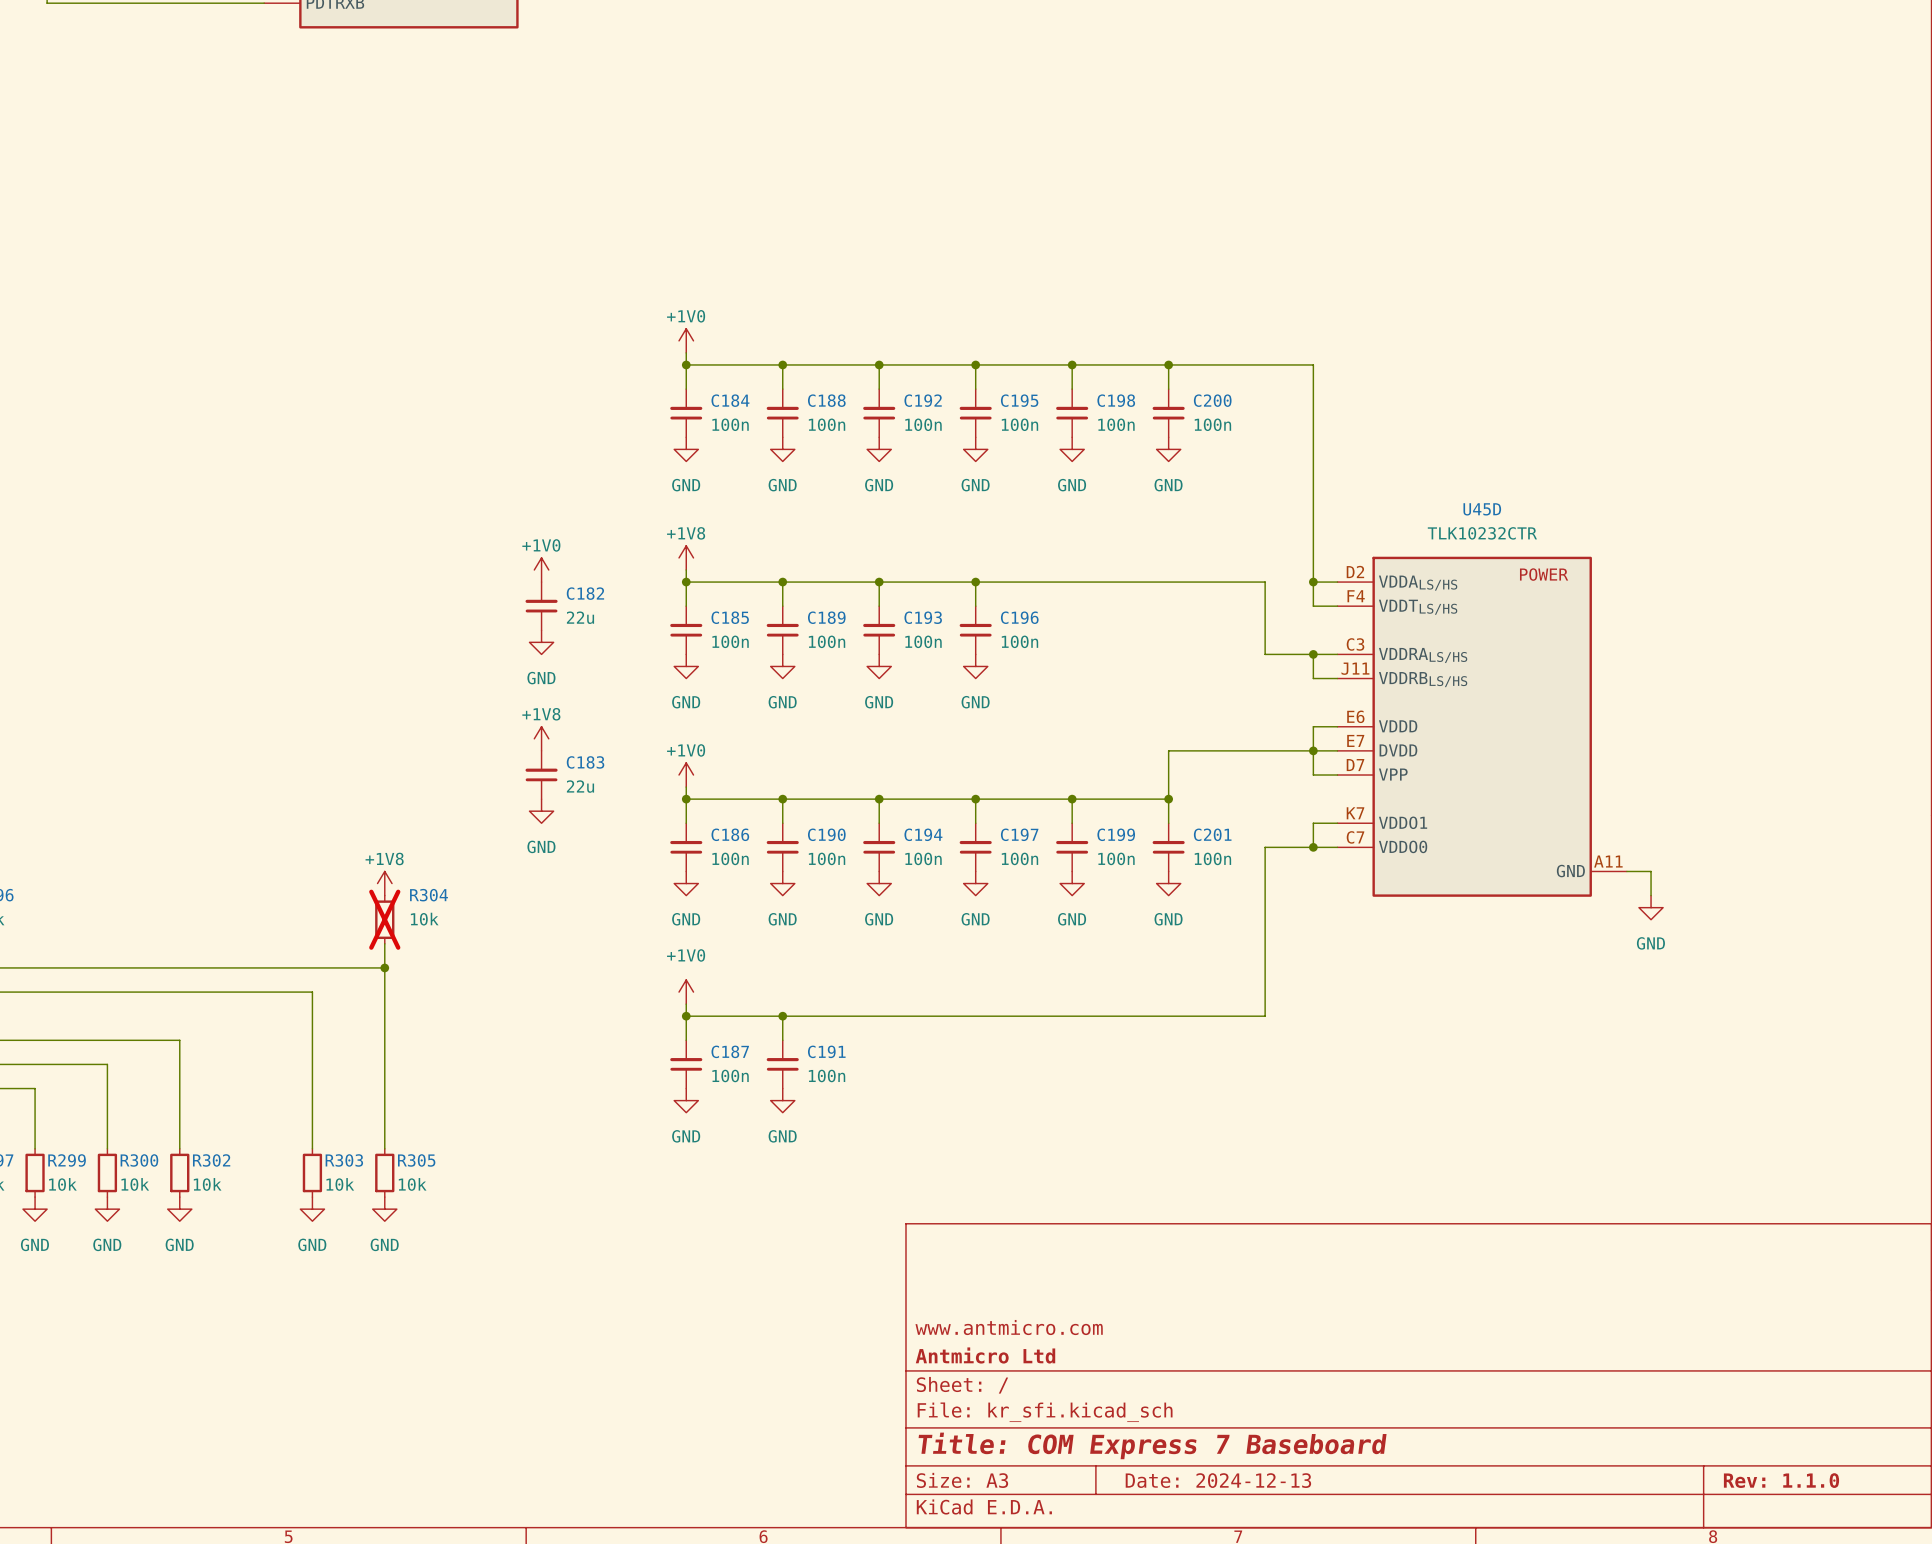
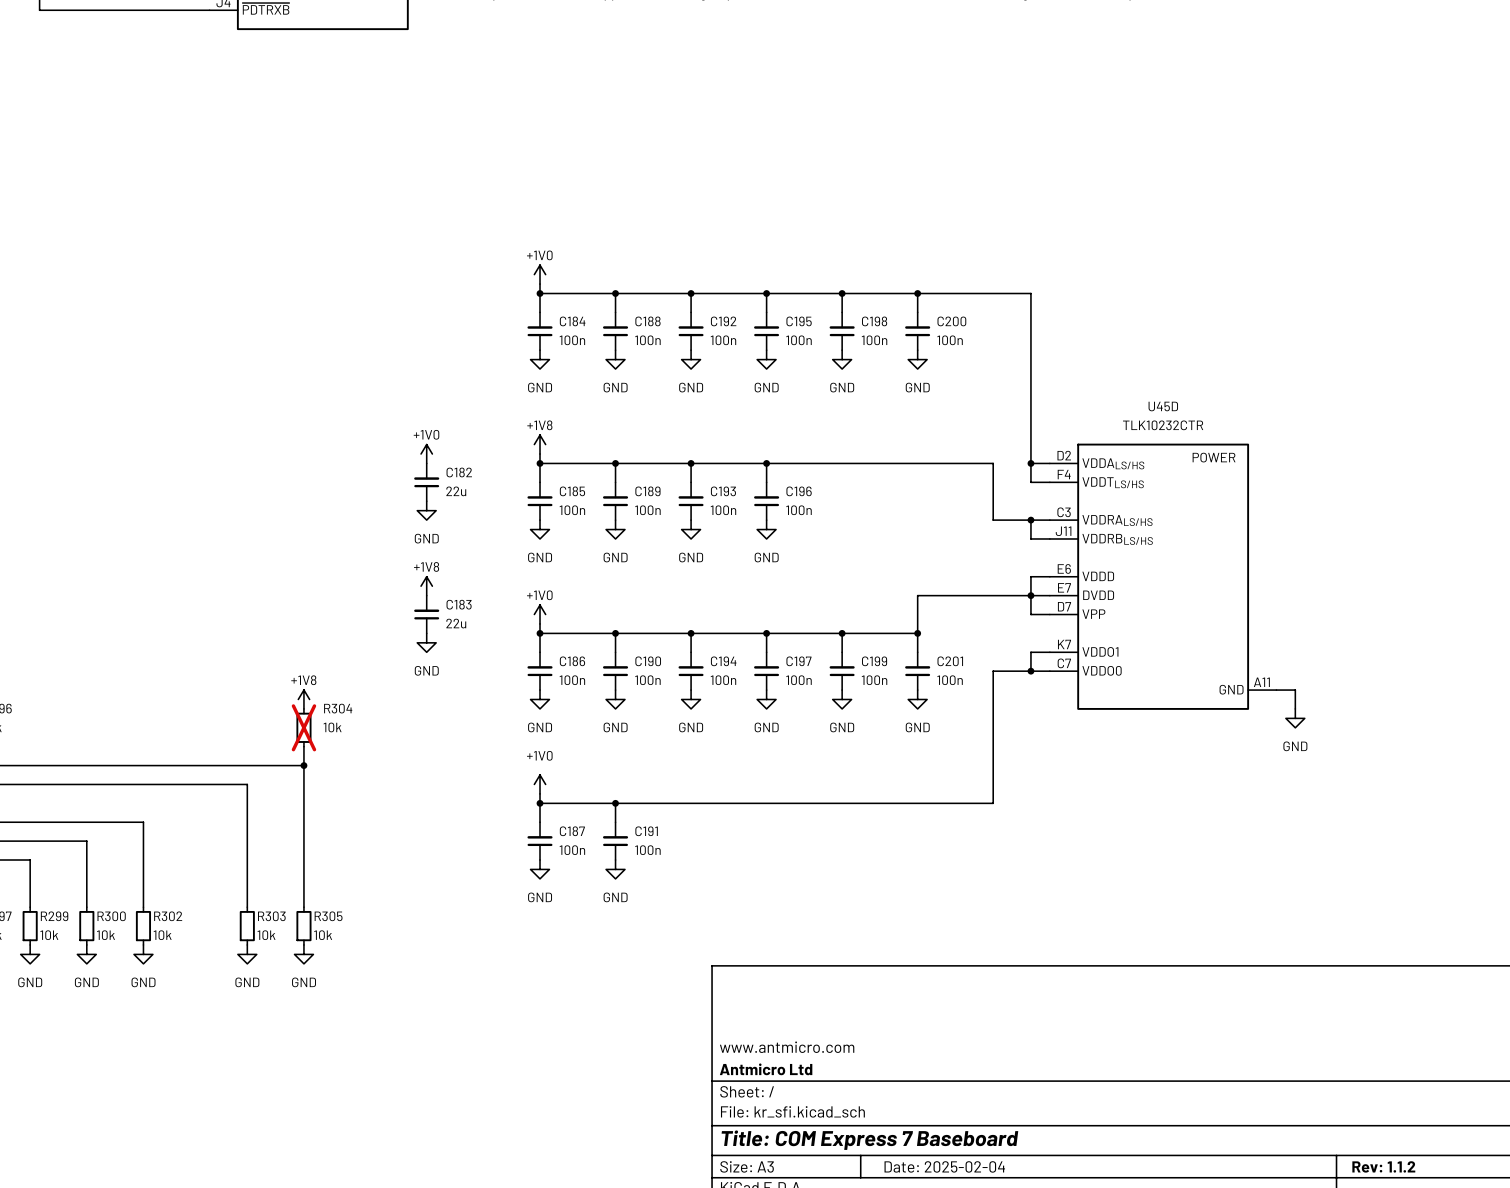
title block: Date: 2024-12-13 (1218, 1480) -> Date: 2025-02-04 (944, 1166)
title block: Rev: 1.1.0 (1781, 1480) -> Rev: 1.1.2 (1383, 1166)

